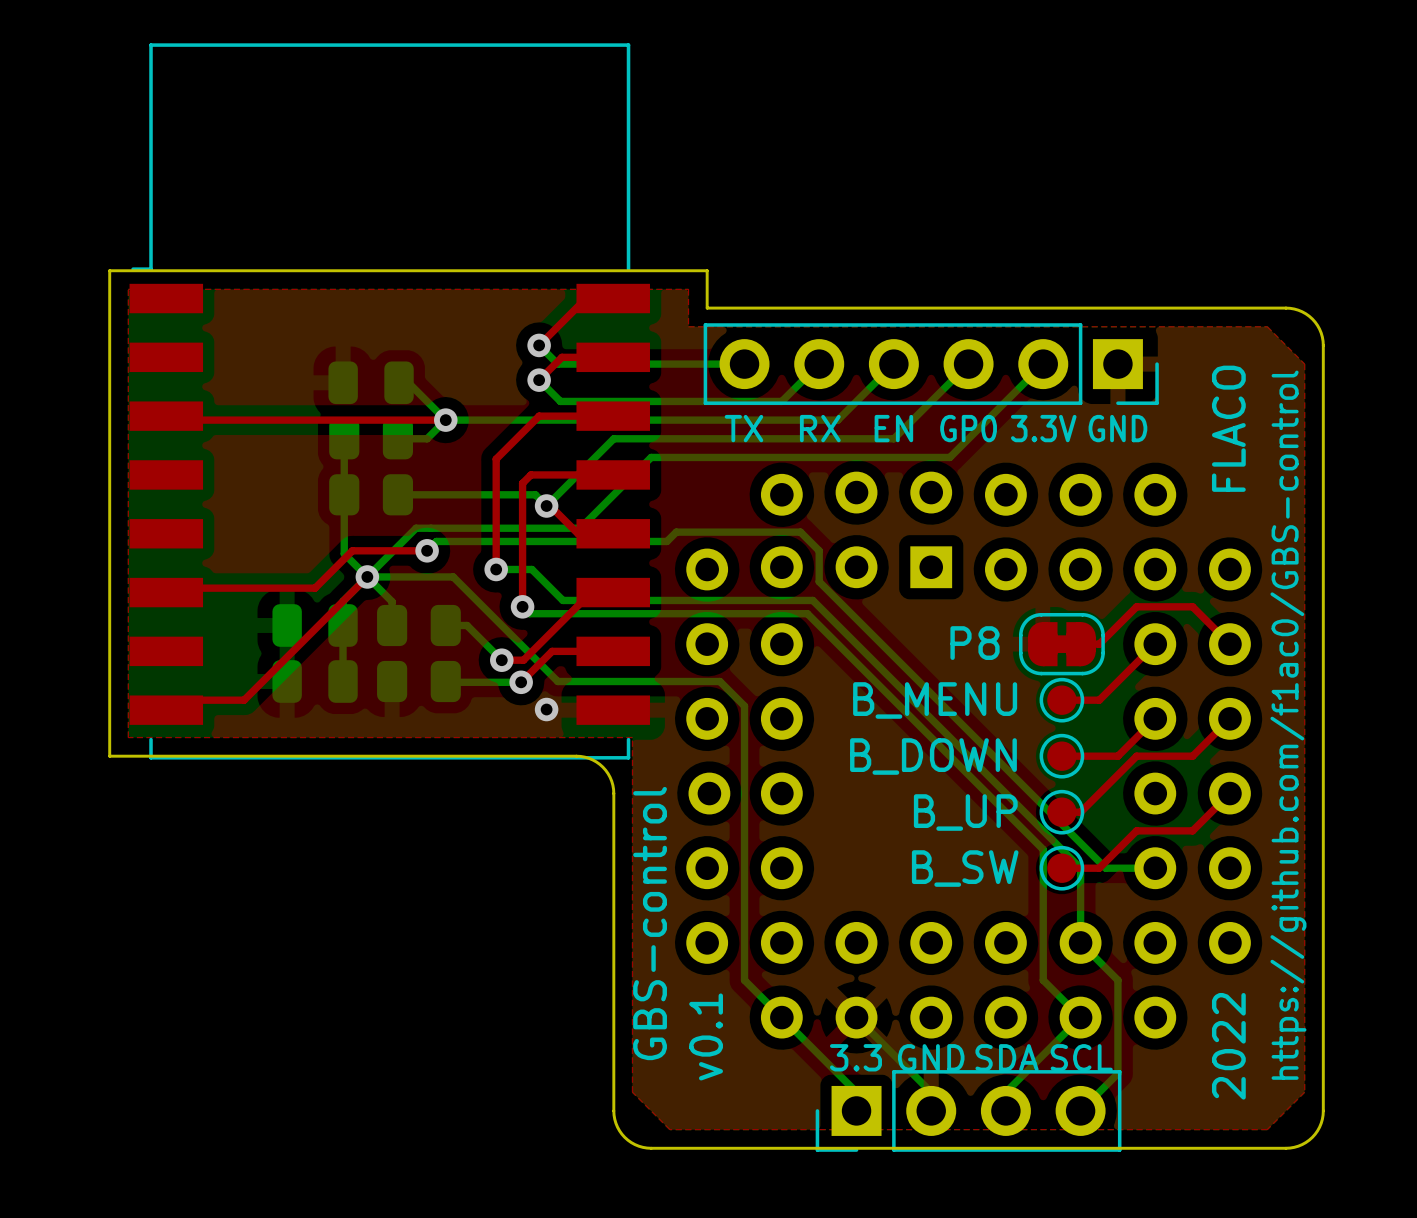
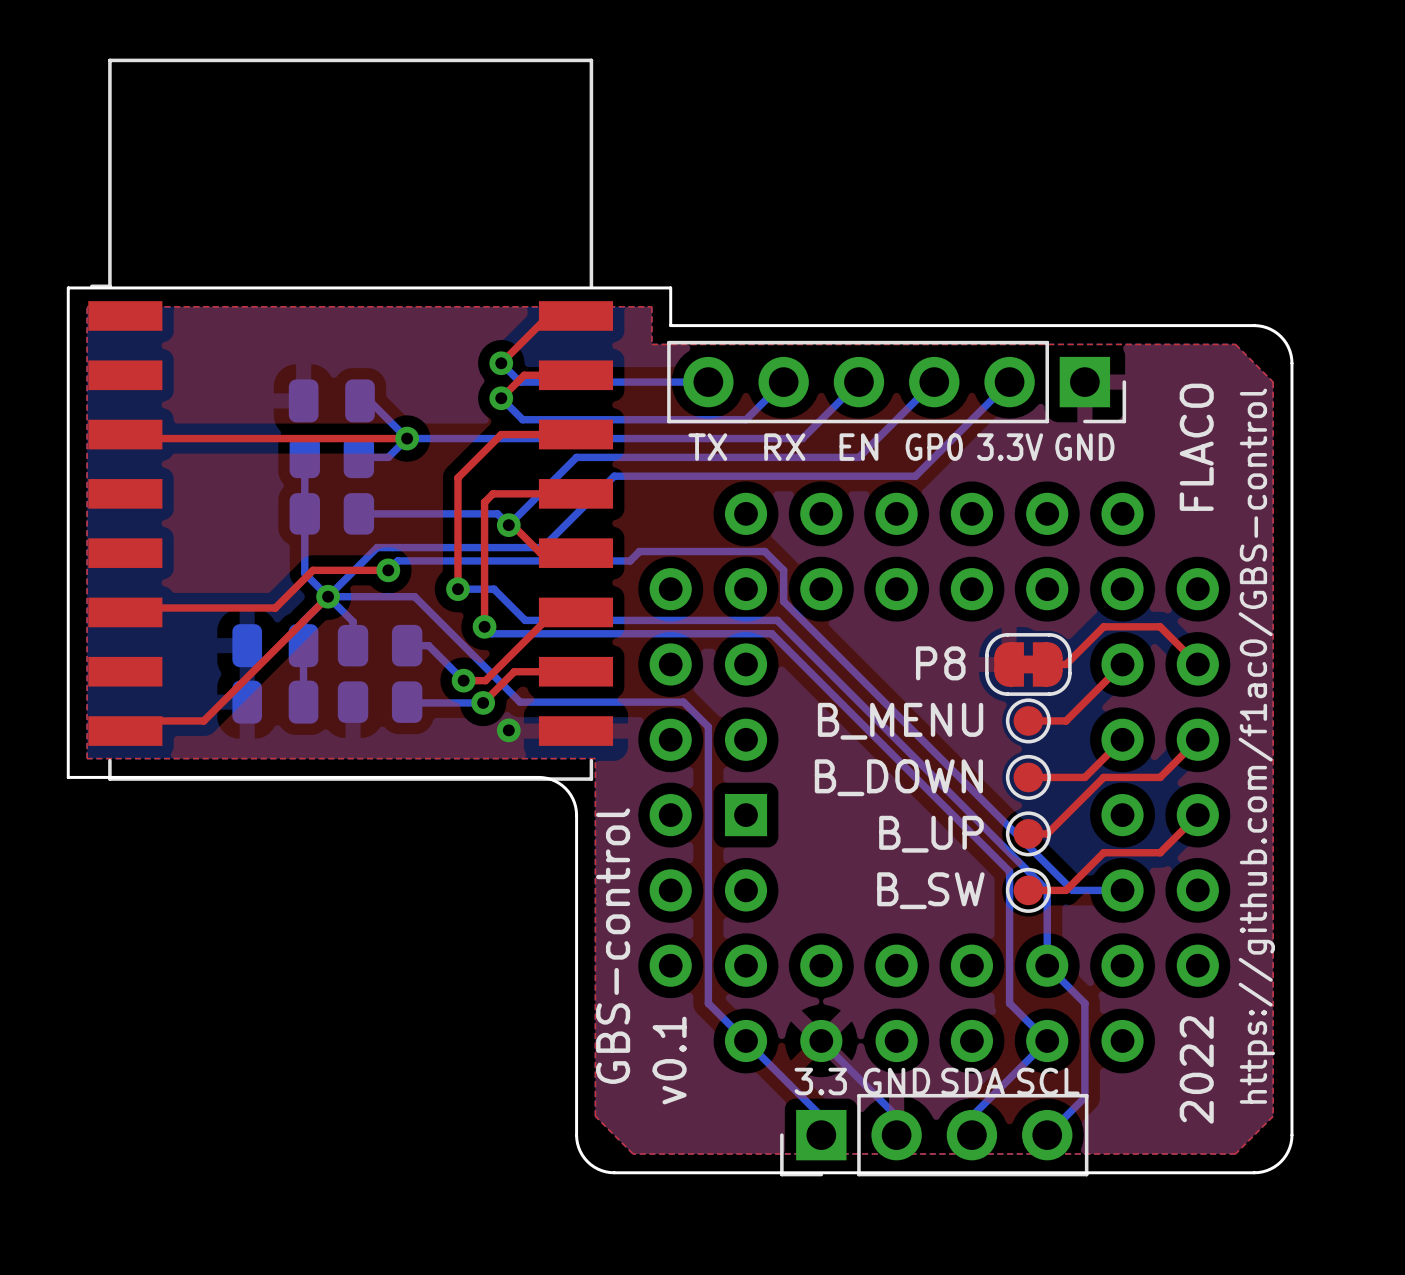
part footprint: [686, 471, 1251, 1039] -> [649, 492, 1219, 1063]

